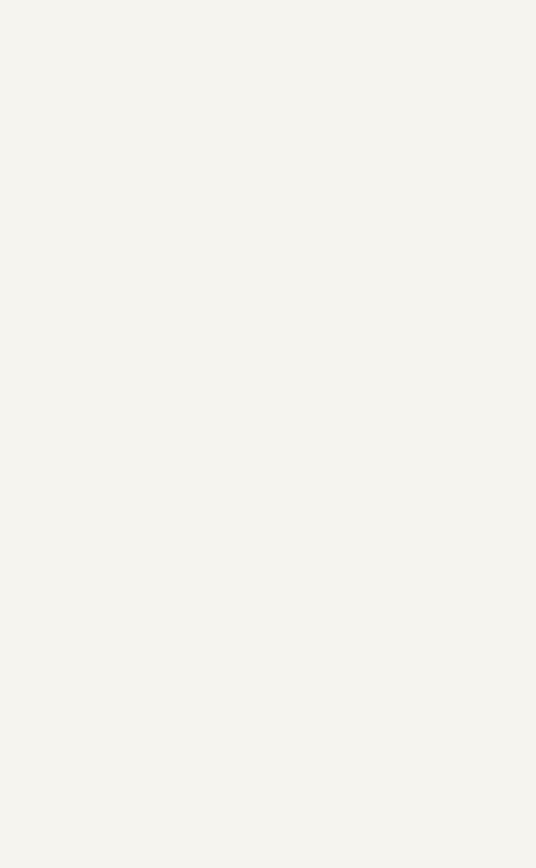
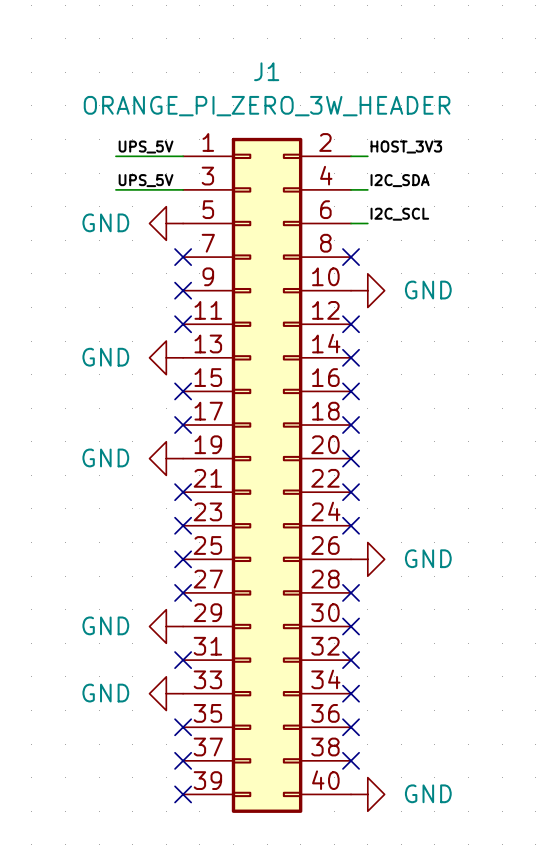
label: none -> UPS_5V (146, 147)
label: none -> HOST_3V3 (406, 147)
wire: none -> (115, 156) (183, 156)
wire: none -> (351, 156) (367, 156)
label: none -> UPS_5V (146, 180)
label: none -> I2C_SDA (400, 180)
wire: none -> (115, 189) (183, 189)
wire: none -> (351, 189) (367, 189)
label: none -> I2C_SCL (399, 214)
power symbol: none -> GND (166, 223)
wire: none -> (351, 223) (367, 223)
no-connect mark: none -> (183, 257)
no-connect mark: none -> (351, 257)
no-connect mark: none -> (183, 290)
power symbol: none -> GND (367, 290)
no-connect mark: none -> (183, 324)
no-connect mark: none -> (351, 324)
power symbol: none -> GND (166, 357)
no-connect mark: none -> (351, 357)
no-connect mark: none -> (183, 391)
no-connect mark: none -> (351, 391)
no-connect mark: none -> (183, 425)
no-connect mark: none -> (351, 425)
power symbol: none -> GND (166, 458)
no-connect mark: none -> (351, 458)
J1: none -> ORANGE_PI_ZERO_3W_HEADER (267, 475)
no-connect mark: none -> (183, 492)
no-connect mark: none -> (351, 492)
no-connect mark: none -> (183, 525)
no-connect mark: none -> (351, 525)
no-connect mark: none -> (183, 559)
power symbol: none -> GND (367, 559)
no-connect mark: none -> (183, 592)
no-connect mark: none -> (351, 592)
power symbol: none -> GND (166, 626)
no-connect mark: none -> (351, 626)
no-connect mark: none -> (183, 660)
no-connect mark: none -> (351, 660)
power symbol: none -> GND (166, 693)
no-connect mark: none -> (351, 693)
no-connect mark: none -> (183, 727)
no-connect mark: none -> (351, 727)
no-connect mark: none -> (183, 760)
no-connect mark: none -> (351, 760)
no-connect mark: none -> (183, 794)
power symbol: none -> GND (367, 794)

